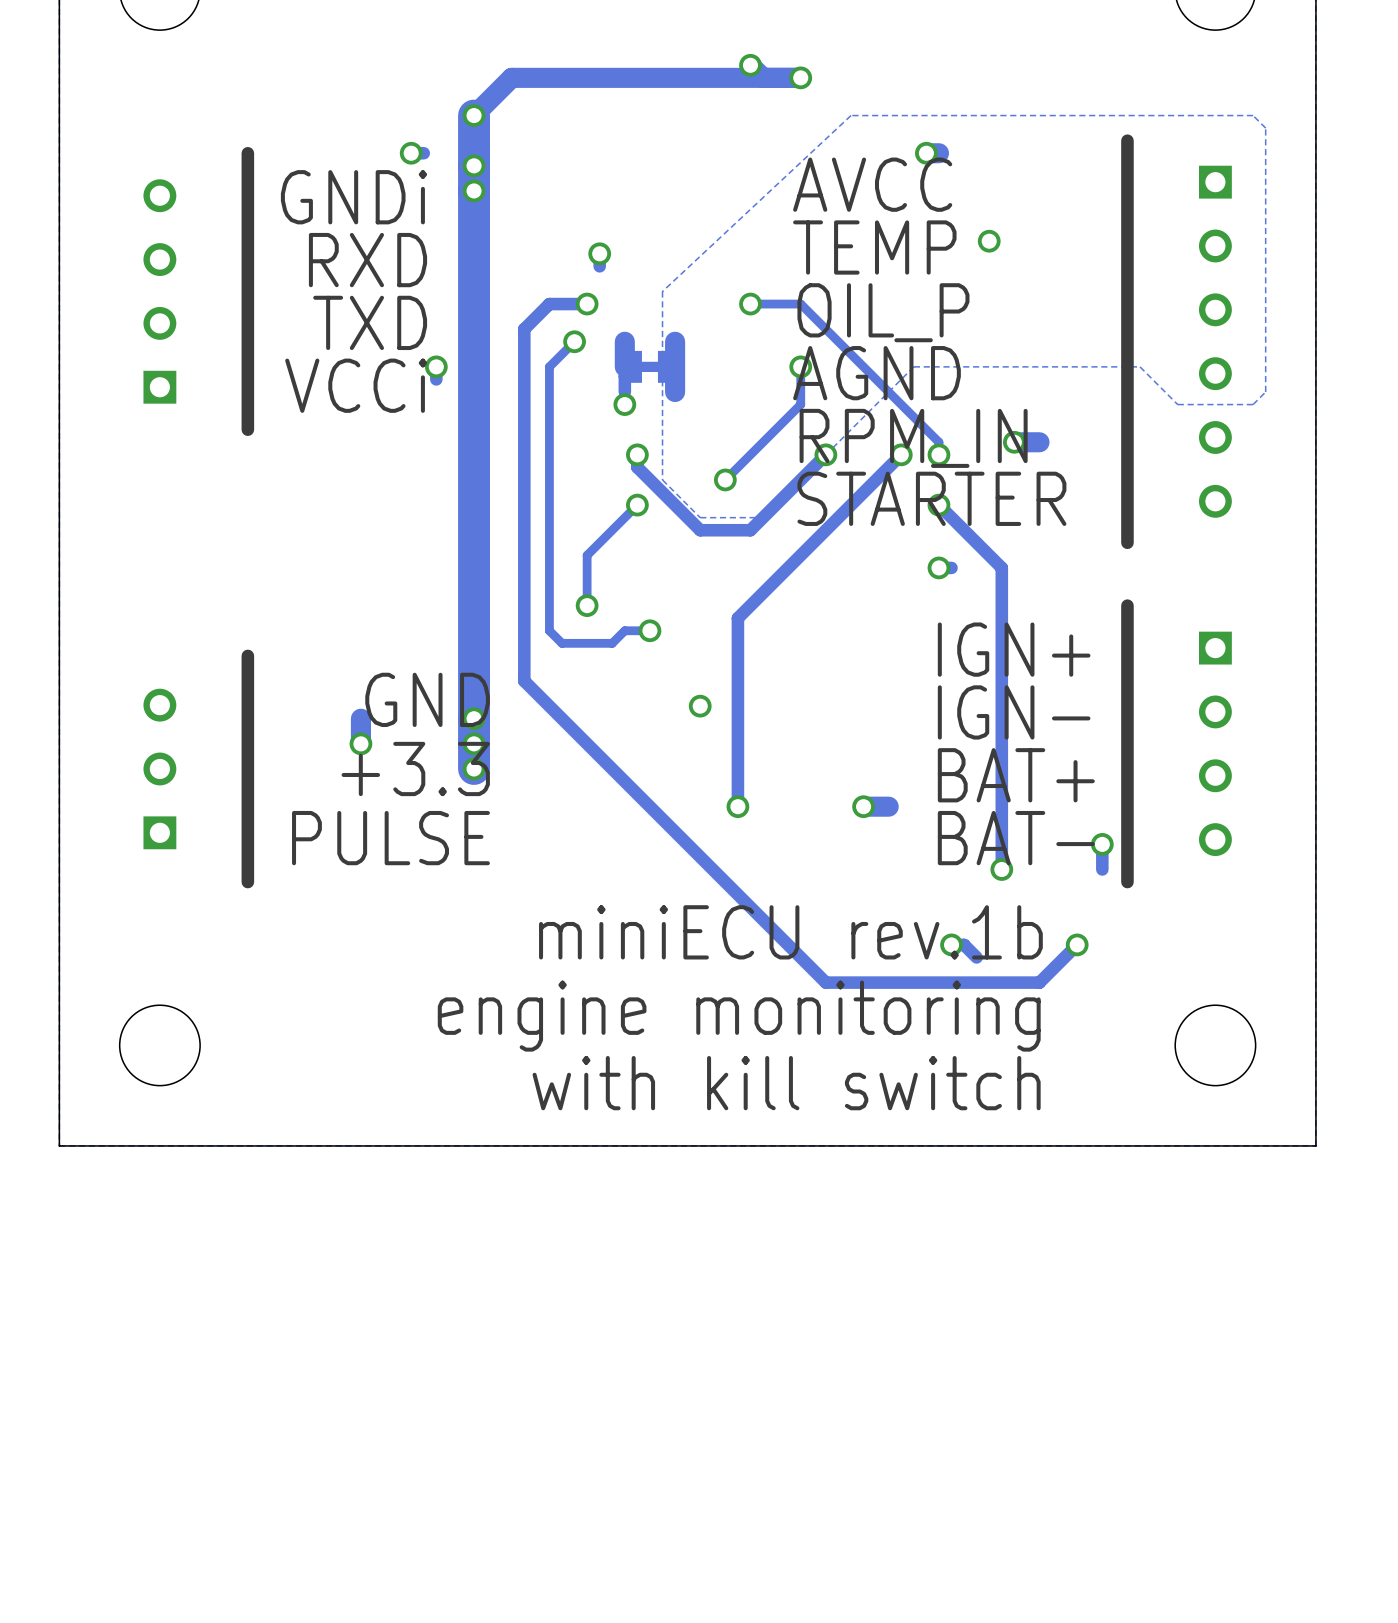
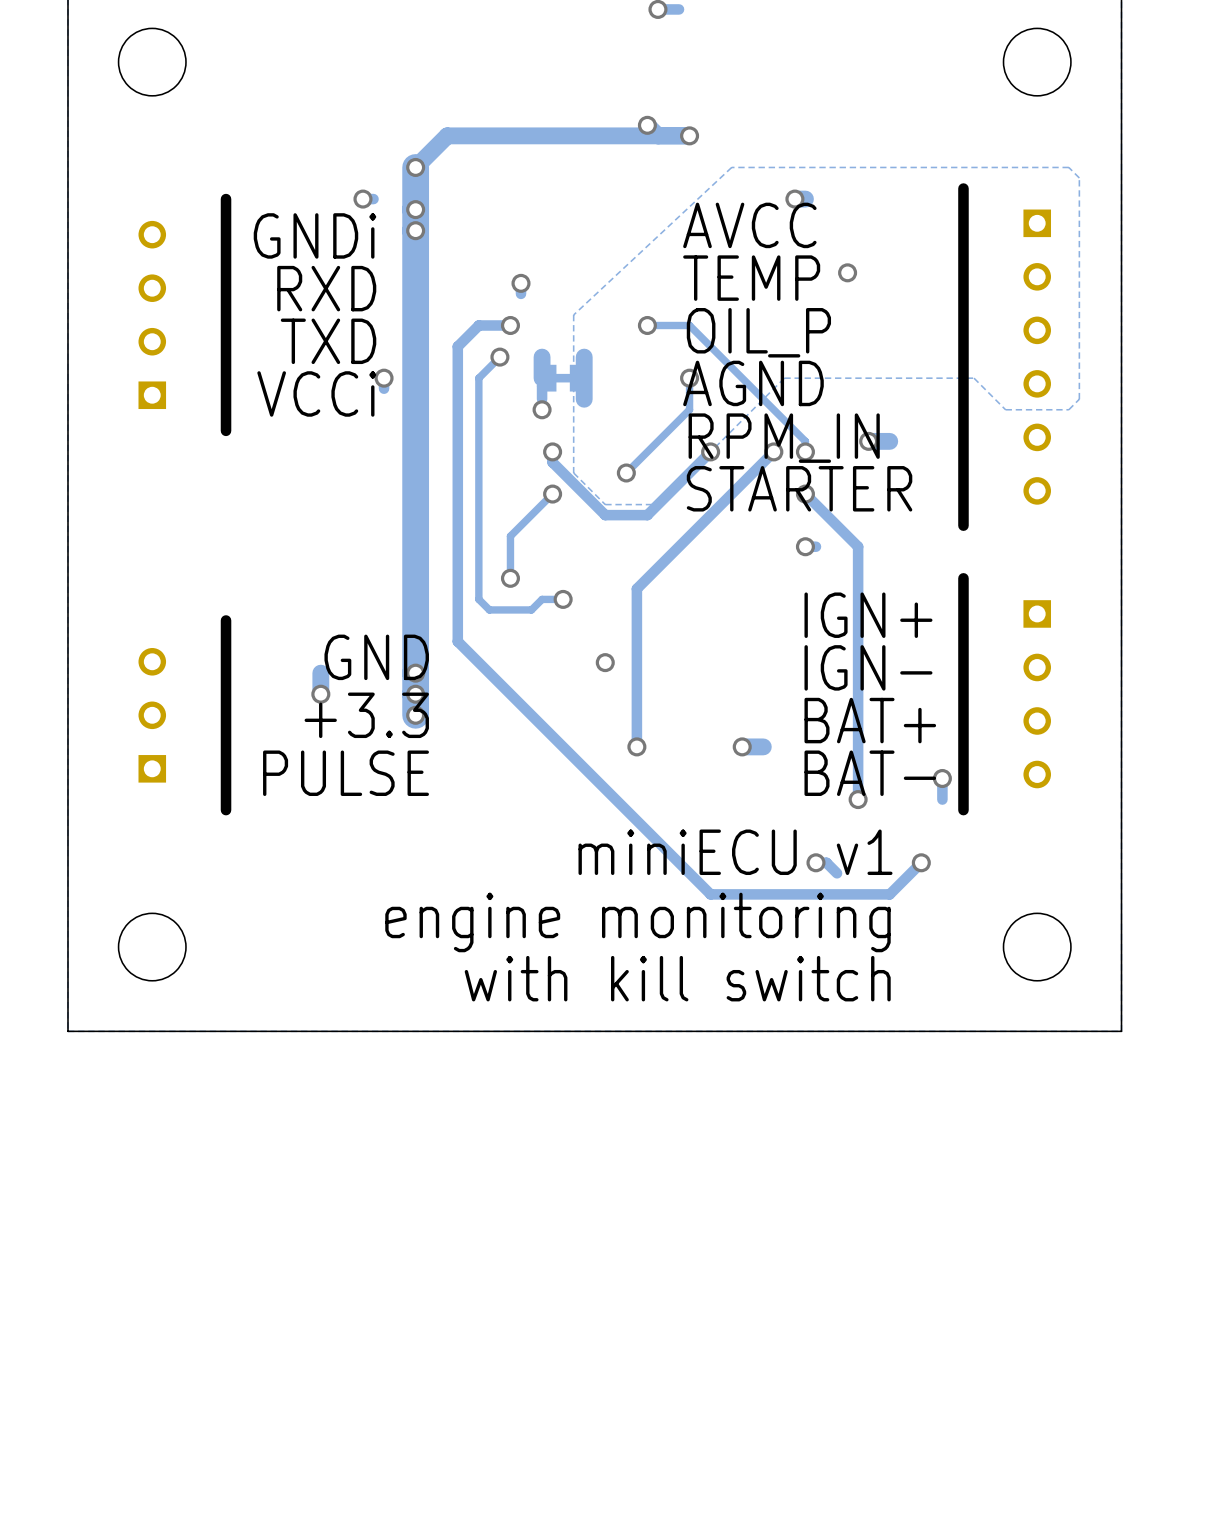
text: miniECU rev.1b (790, 932) -> miniECU v1 (735, 852)

